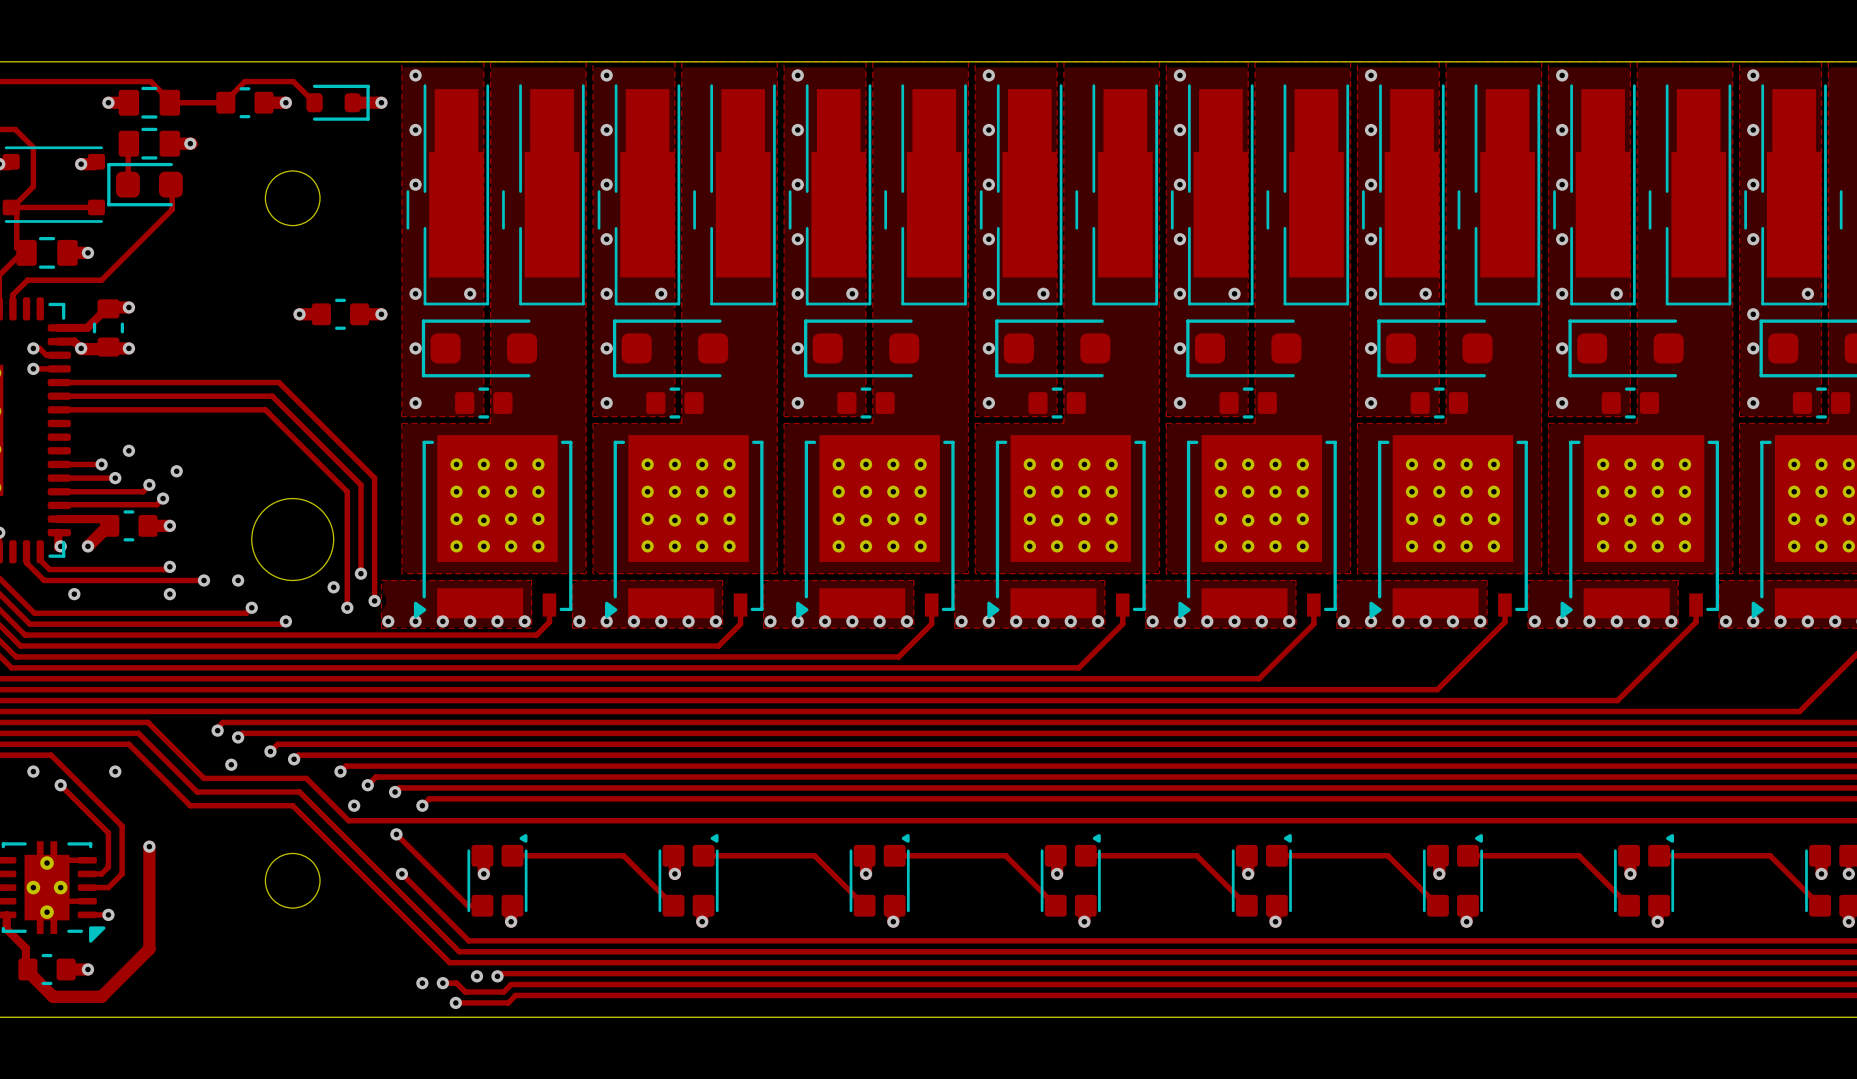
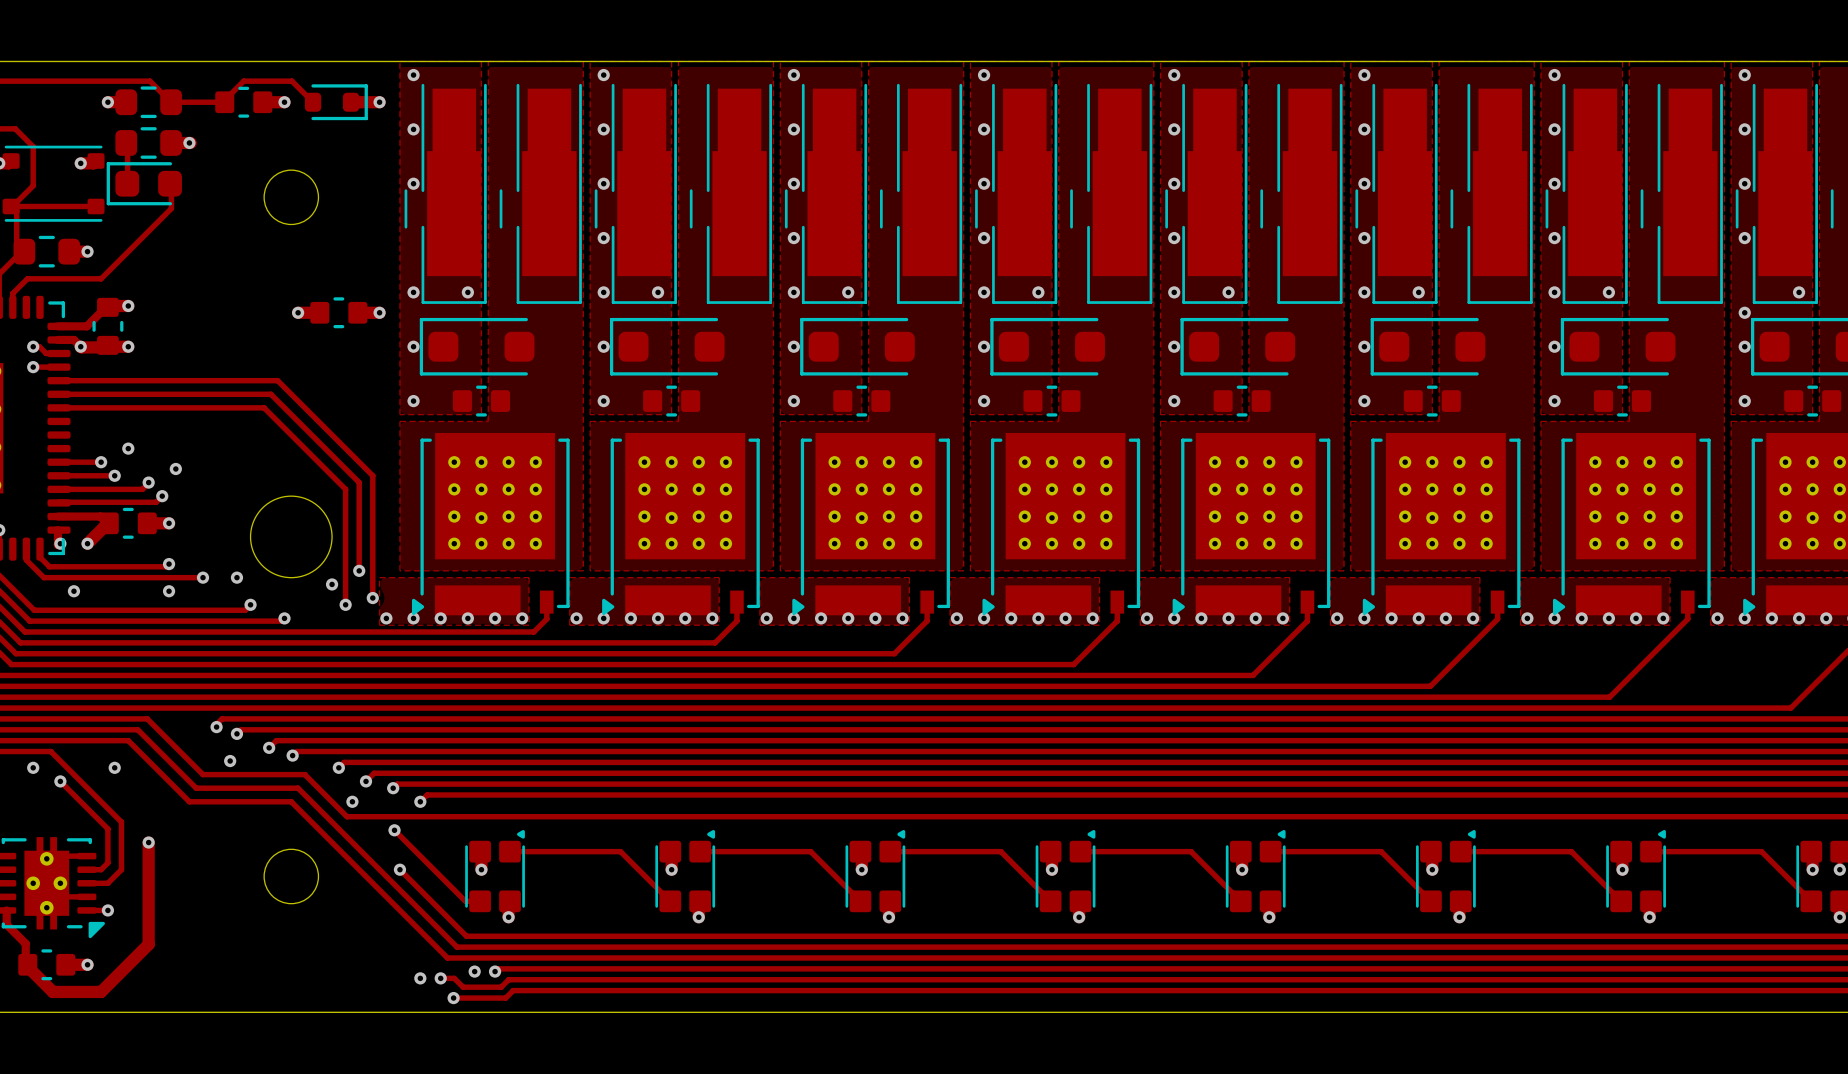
part footprint: [118, 86, 181, 119] -> [115, 86, 182, 119]
part footprint: [118, 127, 181, 160] -> [115, 127, 182, 159]
part footprint: [16, 236, 78, 269] -> [13, 235, 81, 268]

